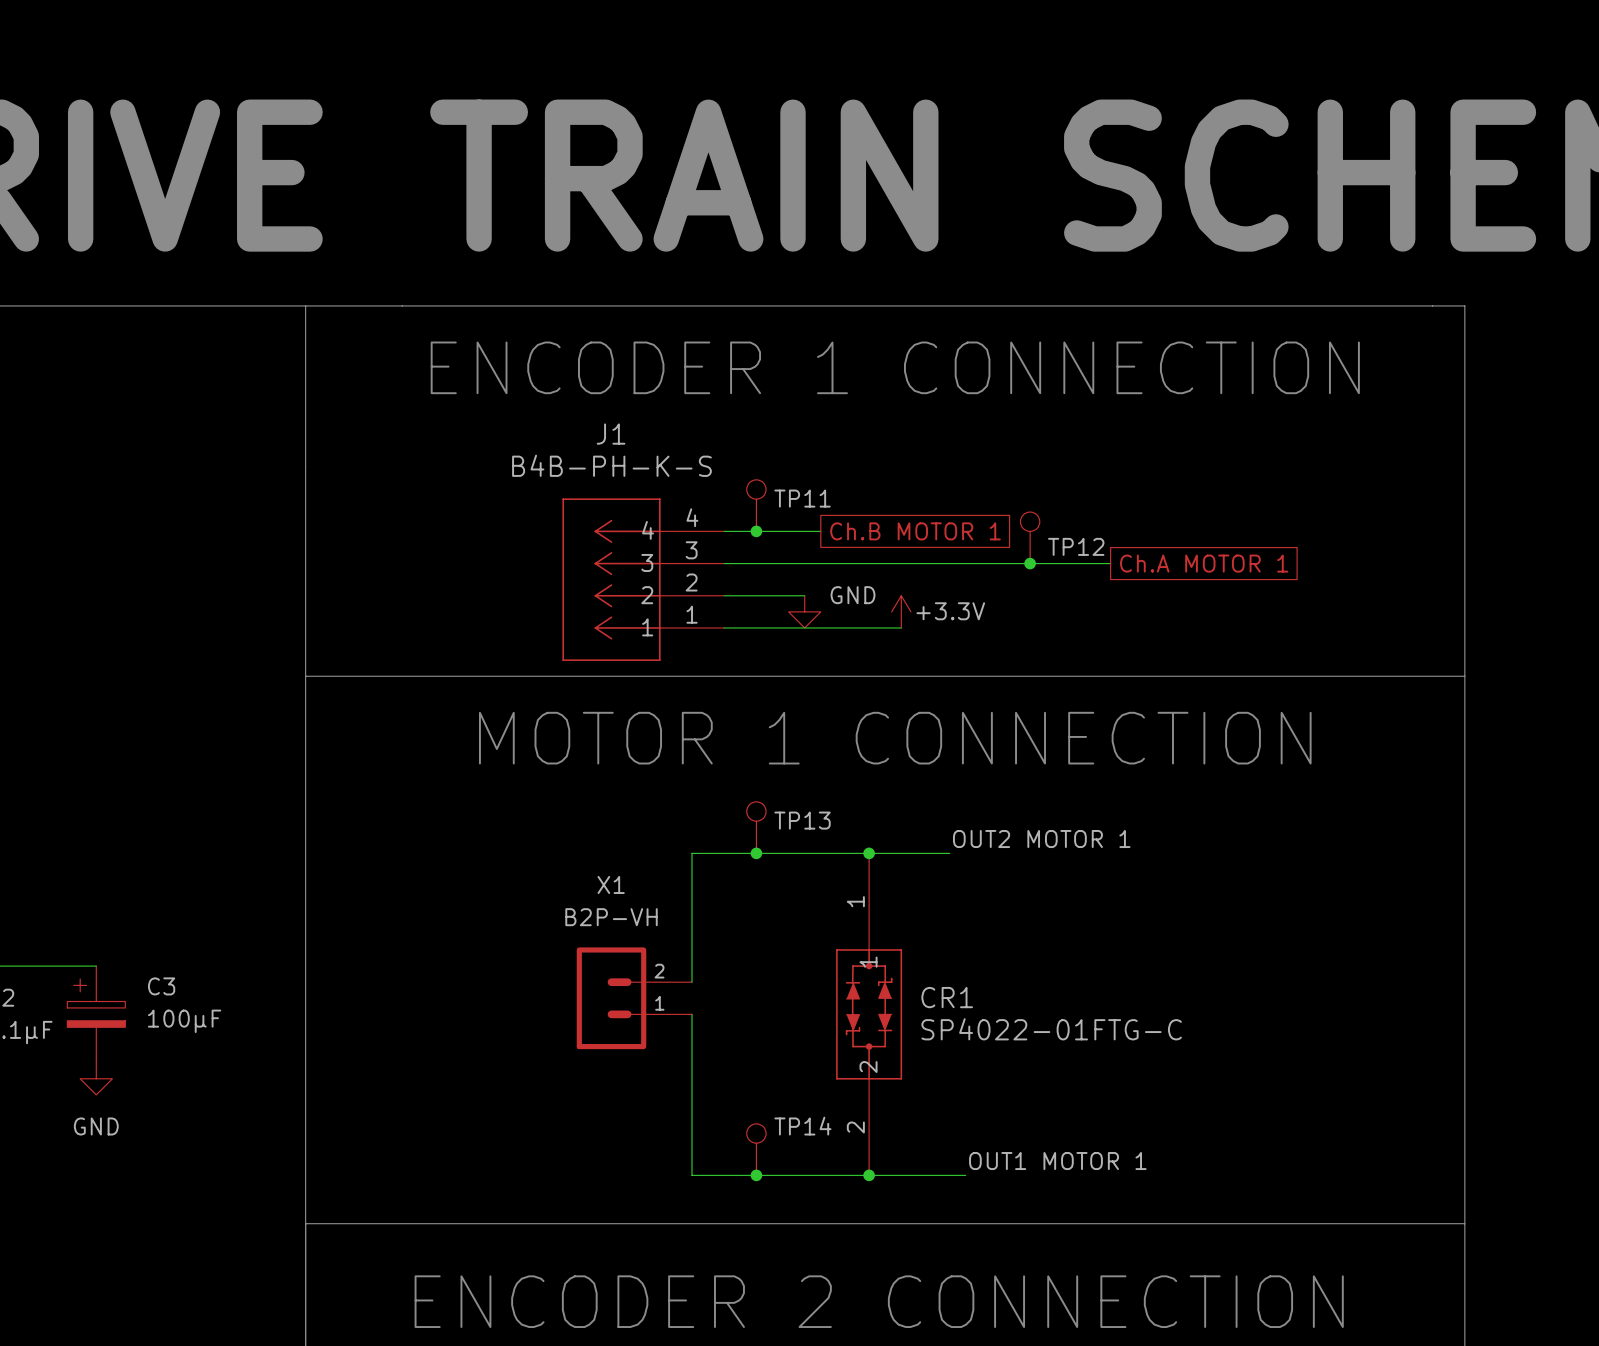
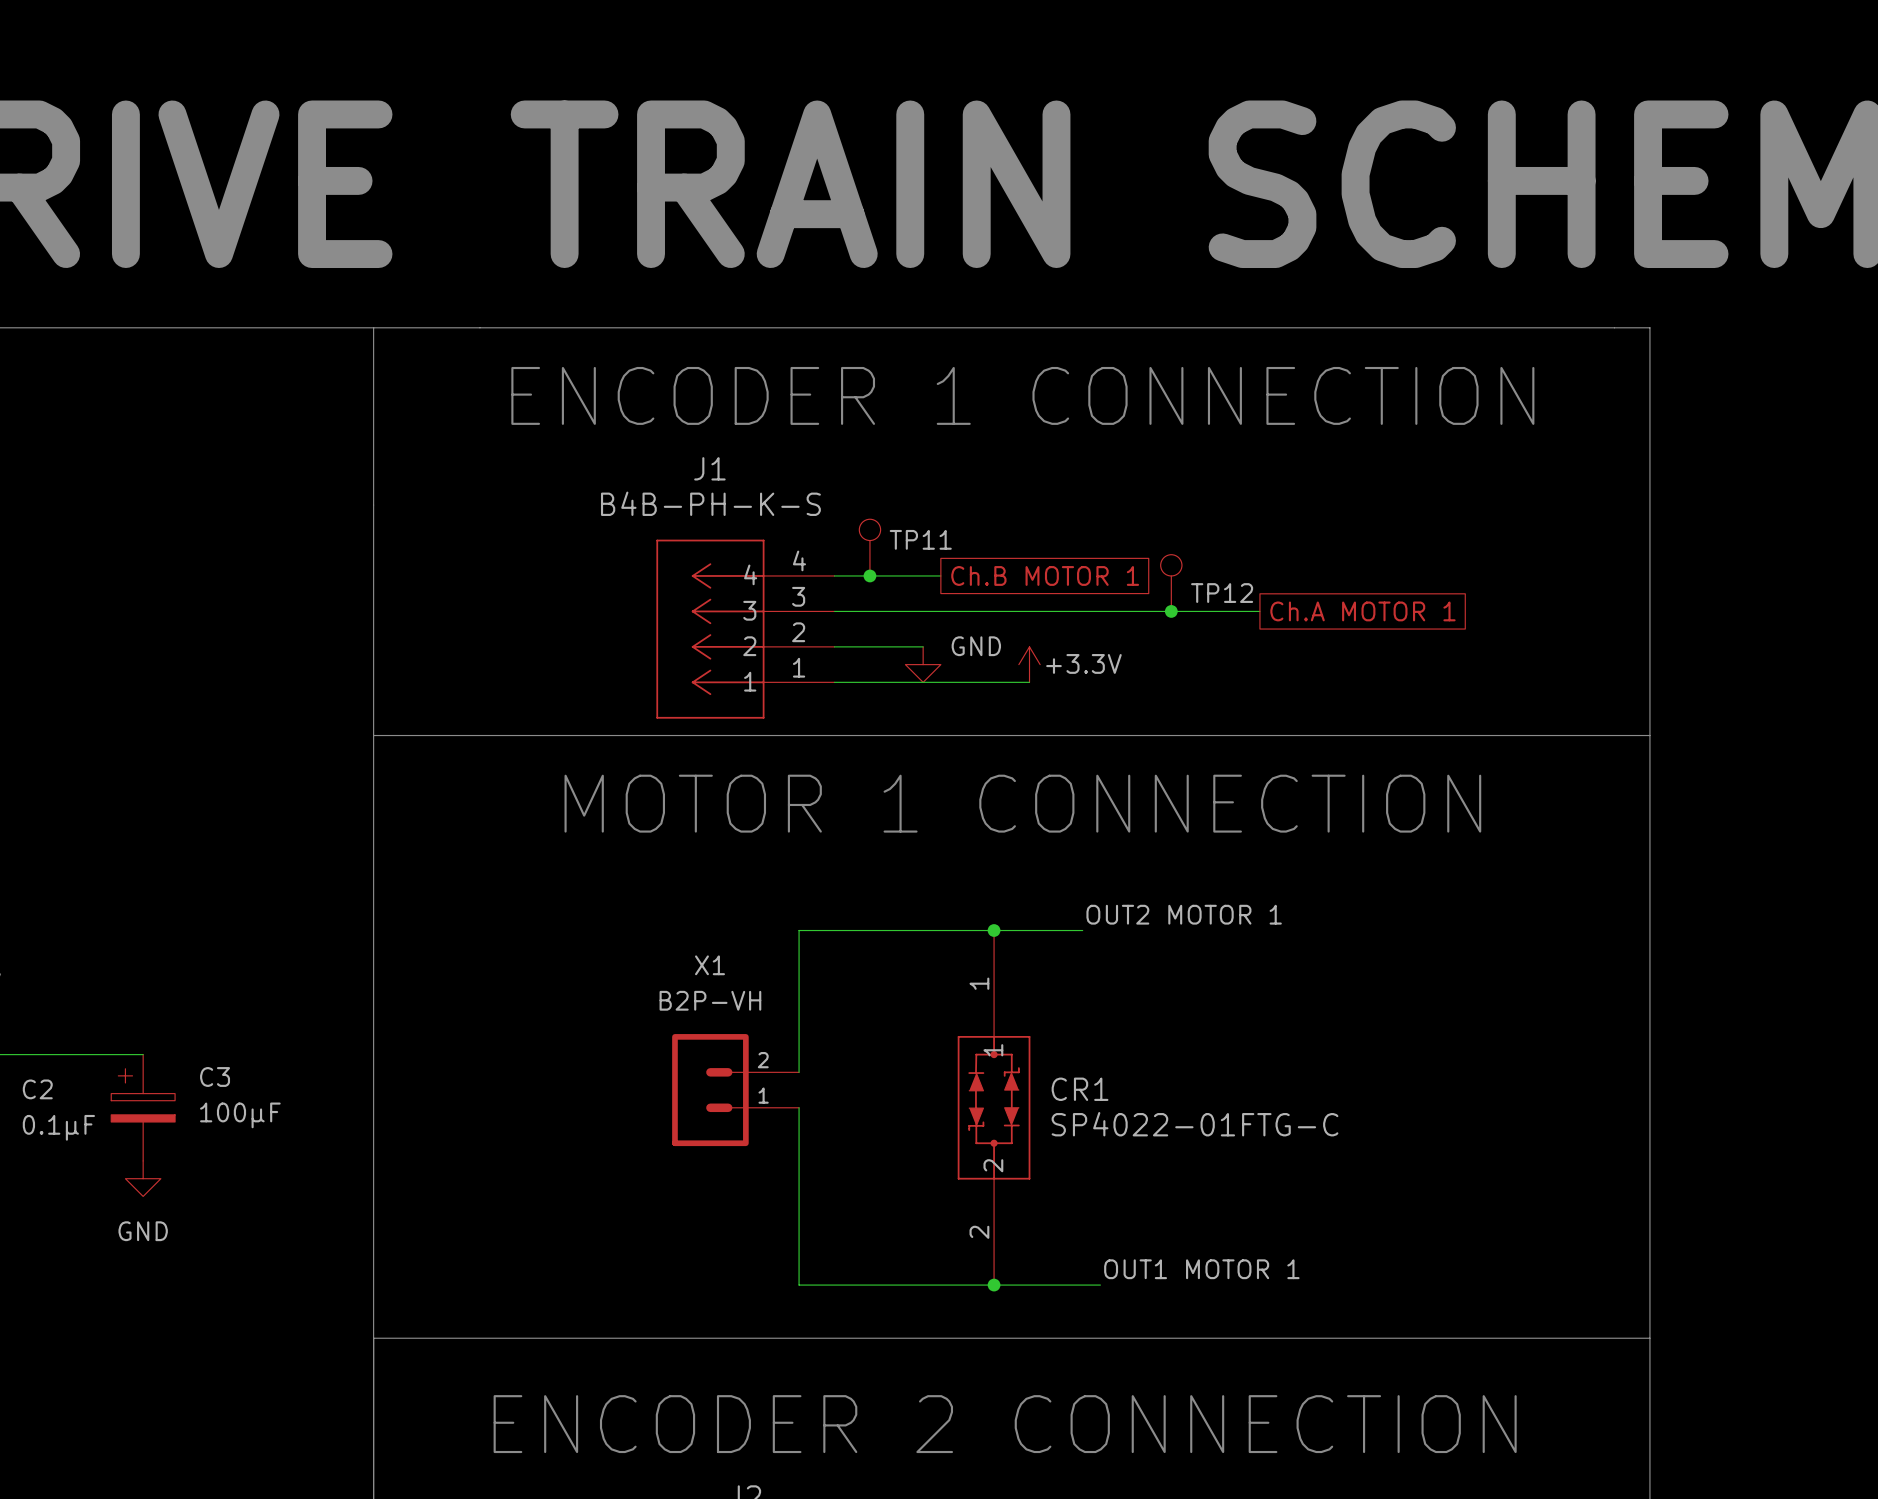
TP13: (756, 827) -> none
junction: (756, 853) -> none
TP14: (756, 1149) -> none
junction: (756, 1175) -> none

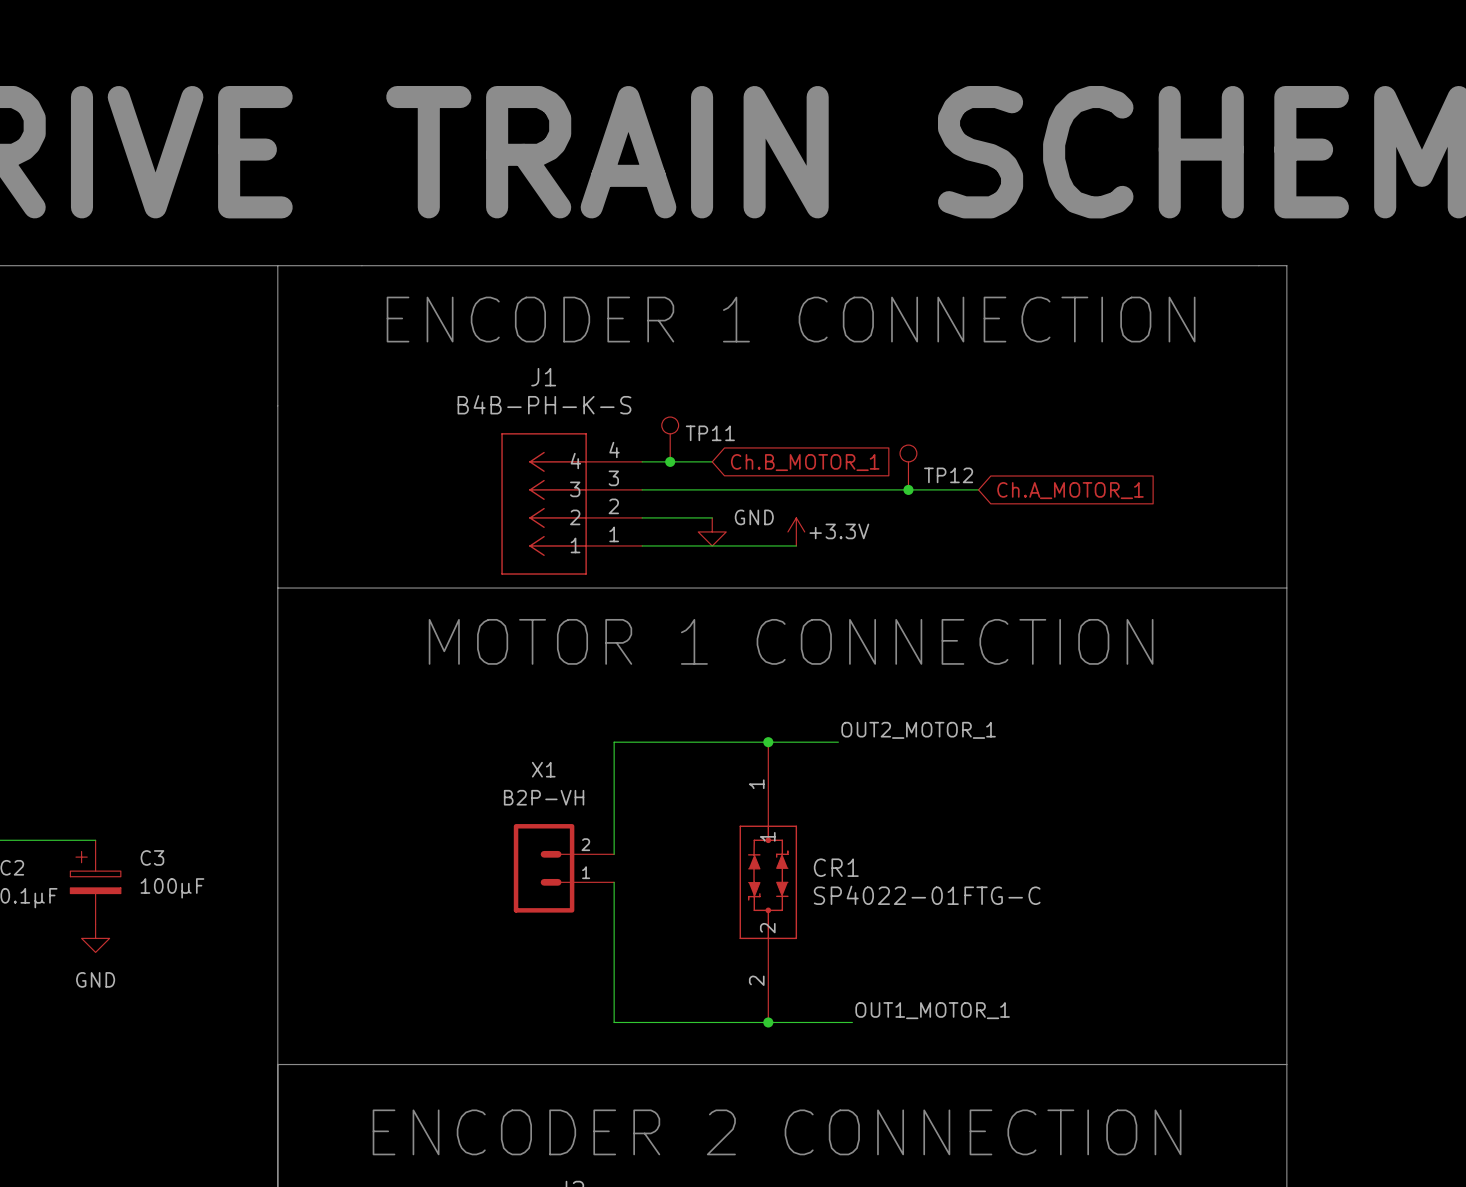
wire: (923, 575) (940, 575) -> none
global label shape: passive (1045, 575) -> input (805, 462)
global label: Ch.B MOTOR 1 (1045, 575) -> Ch.B_MOTOR_1 (805, 462)
global label shape: passive (1362, 611) -> input (1070, 490)
global label: Ch.A MOTOR 1 (1362, 611) -> Ch.A_MOTOR_1 (1070, 490)
label: OUT2 MOTOR 1 (1184, 914) -> OUT2_MOTOR_1 (918, 730)
label: OUT1 MOTOR 1 (1201, 1269) -> OUT1_MOTOR_1 (932, 1010)

